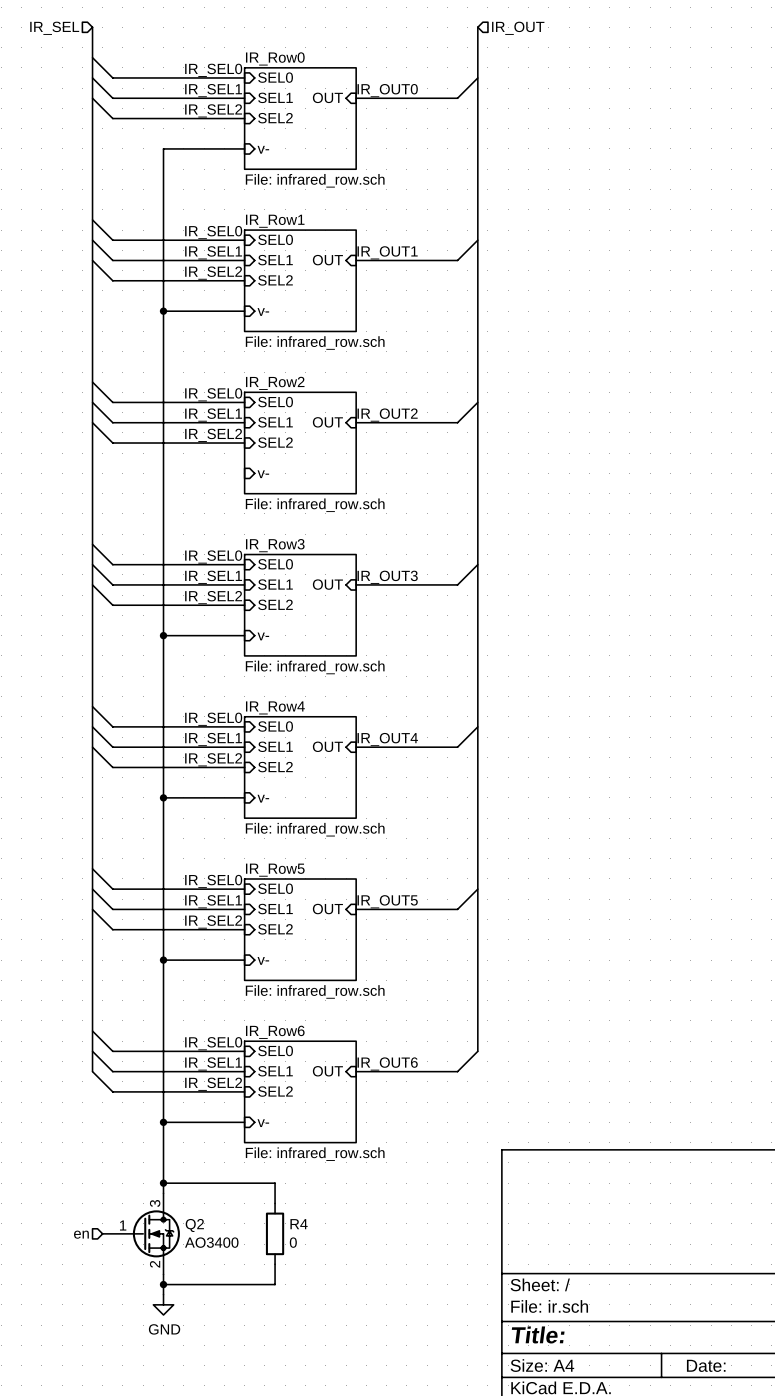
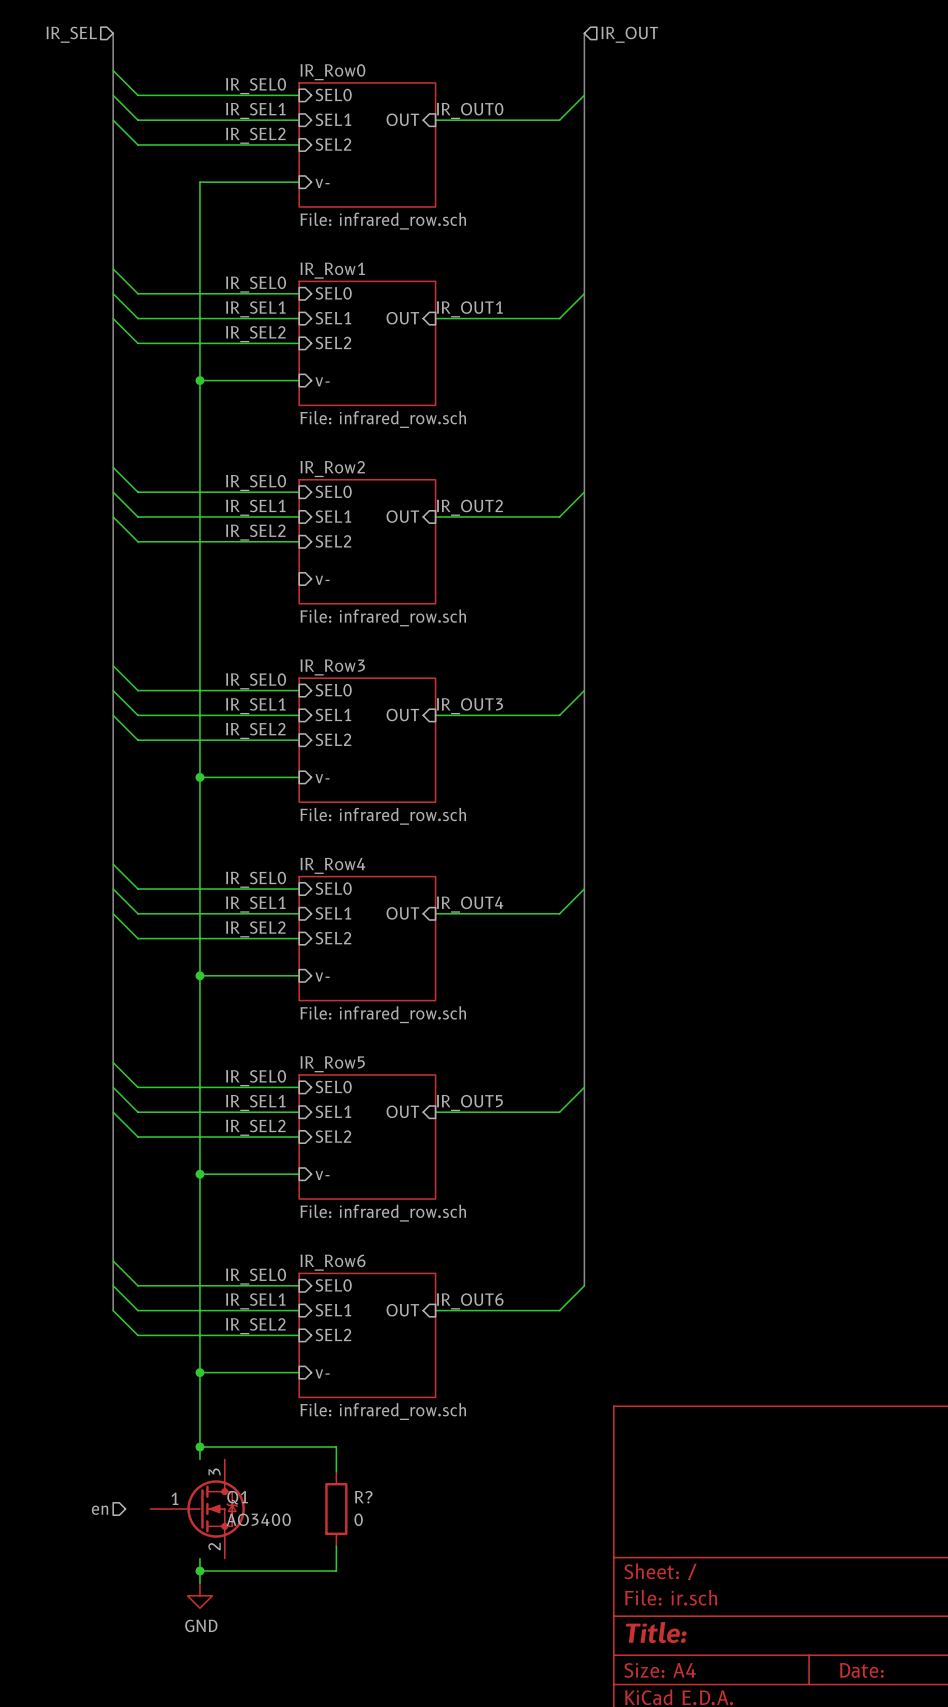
R4 name: R4 (299, 1224) -> R? (363, 1497)
Q2: AO3400 (141, 1233) -> none
Q1: none -> AO3400 (197, 1509)

